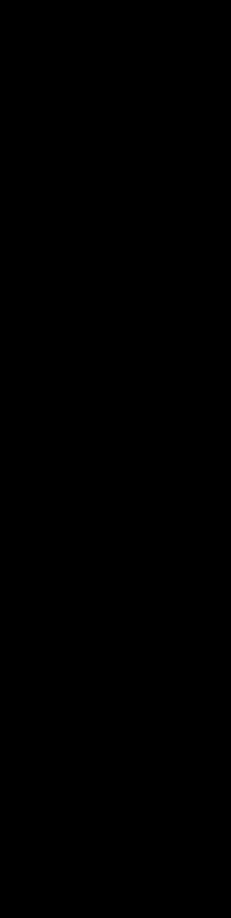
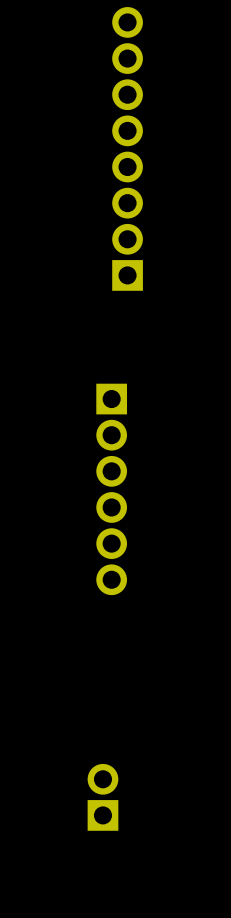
part: none -> (127, 148)
part: none -> (111, 489)
part: none -> (102, 797)

